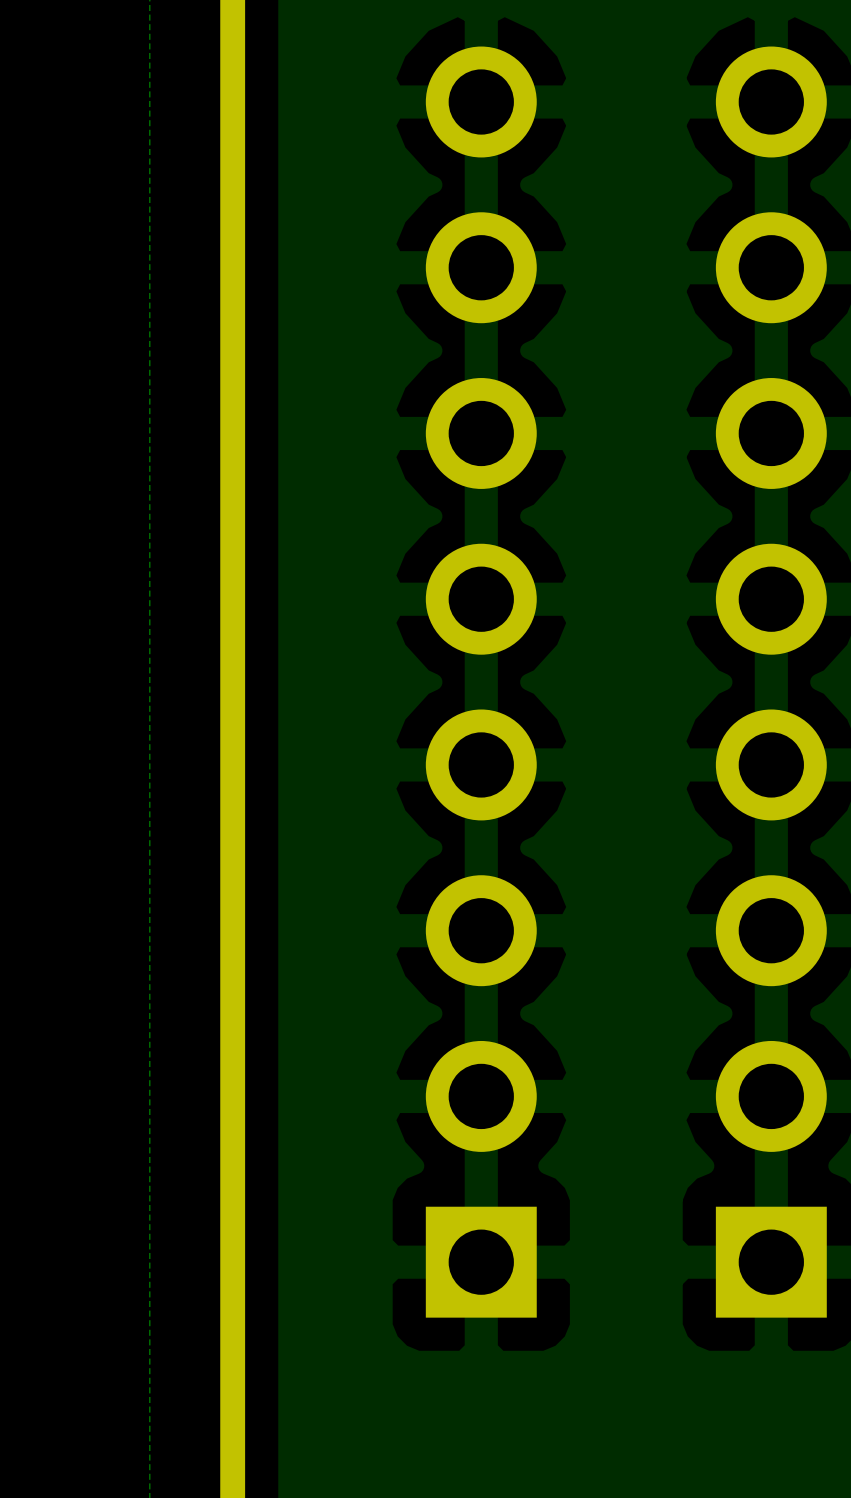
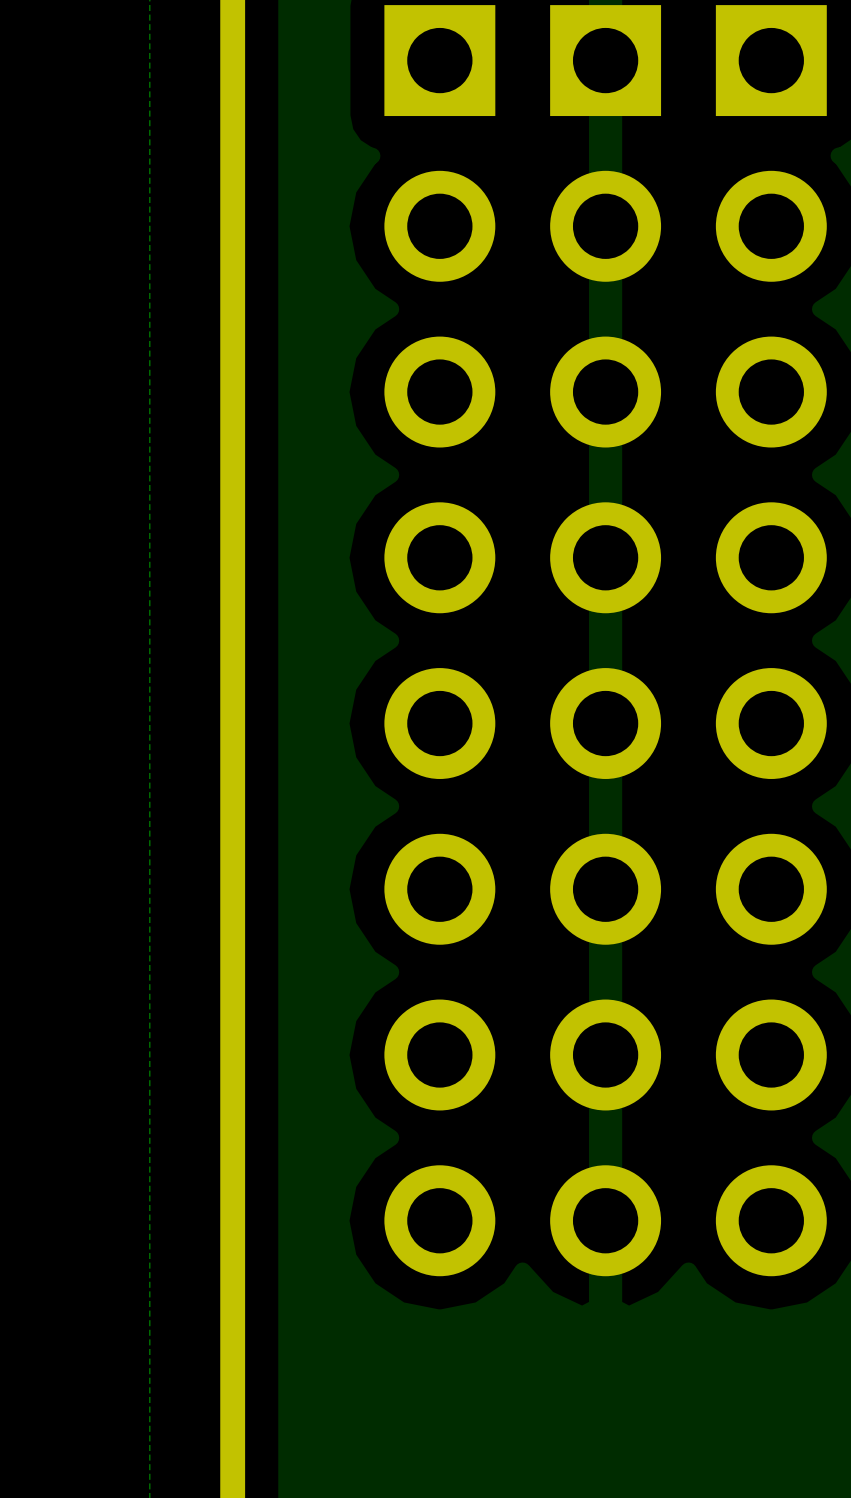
part: none -> (605, 640)
part rotation: 0° (481, 682) -> 180° (439, 640)
part rotation: 0° (771, 682) -> 180° (771, 640)

